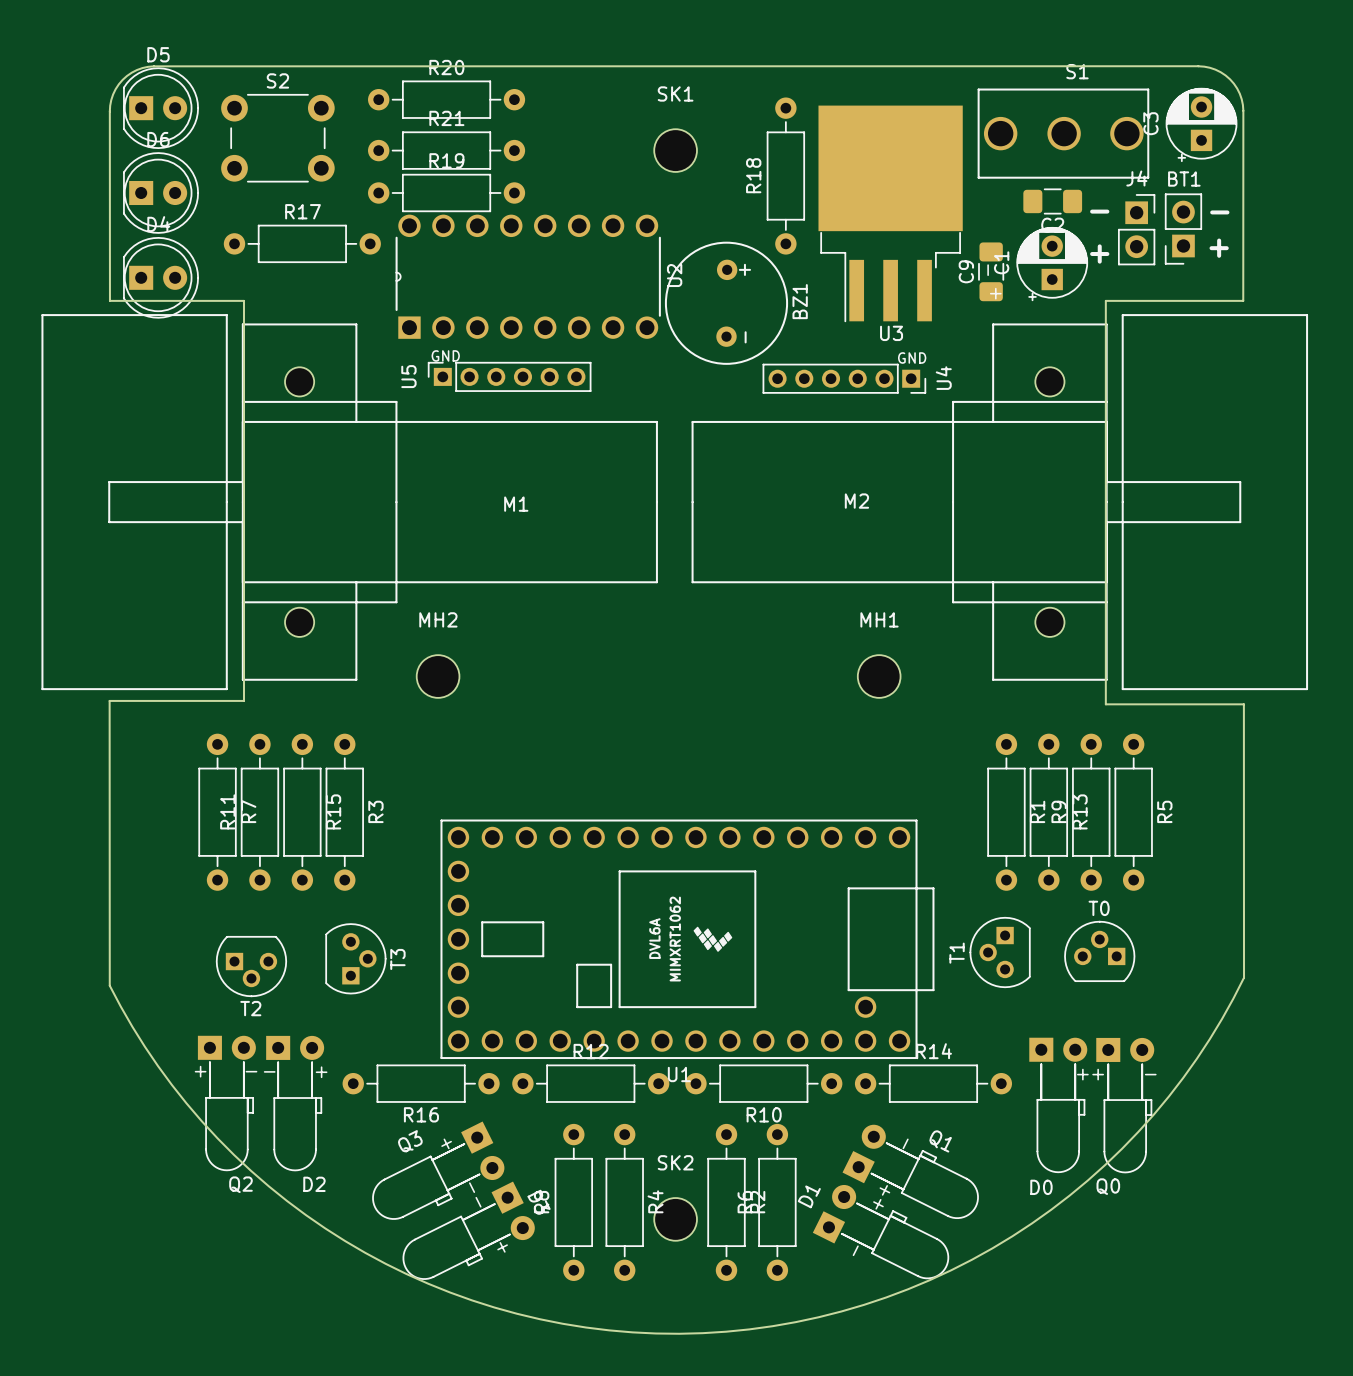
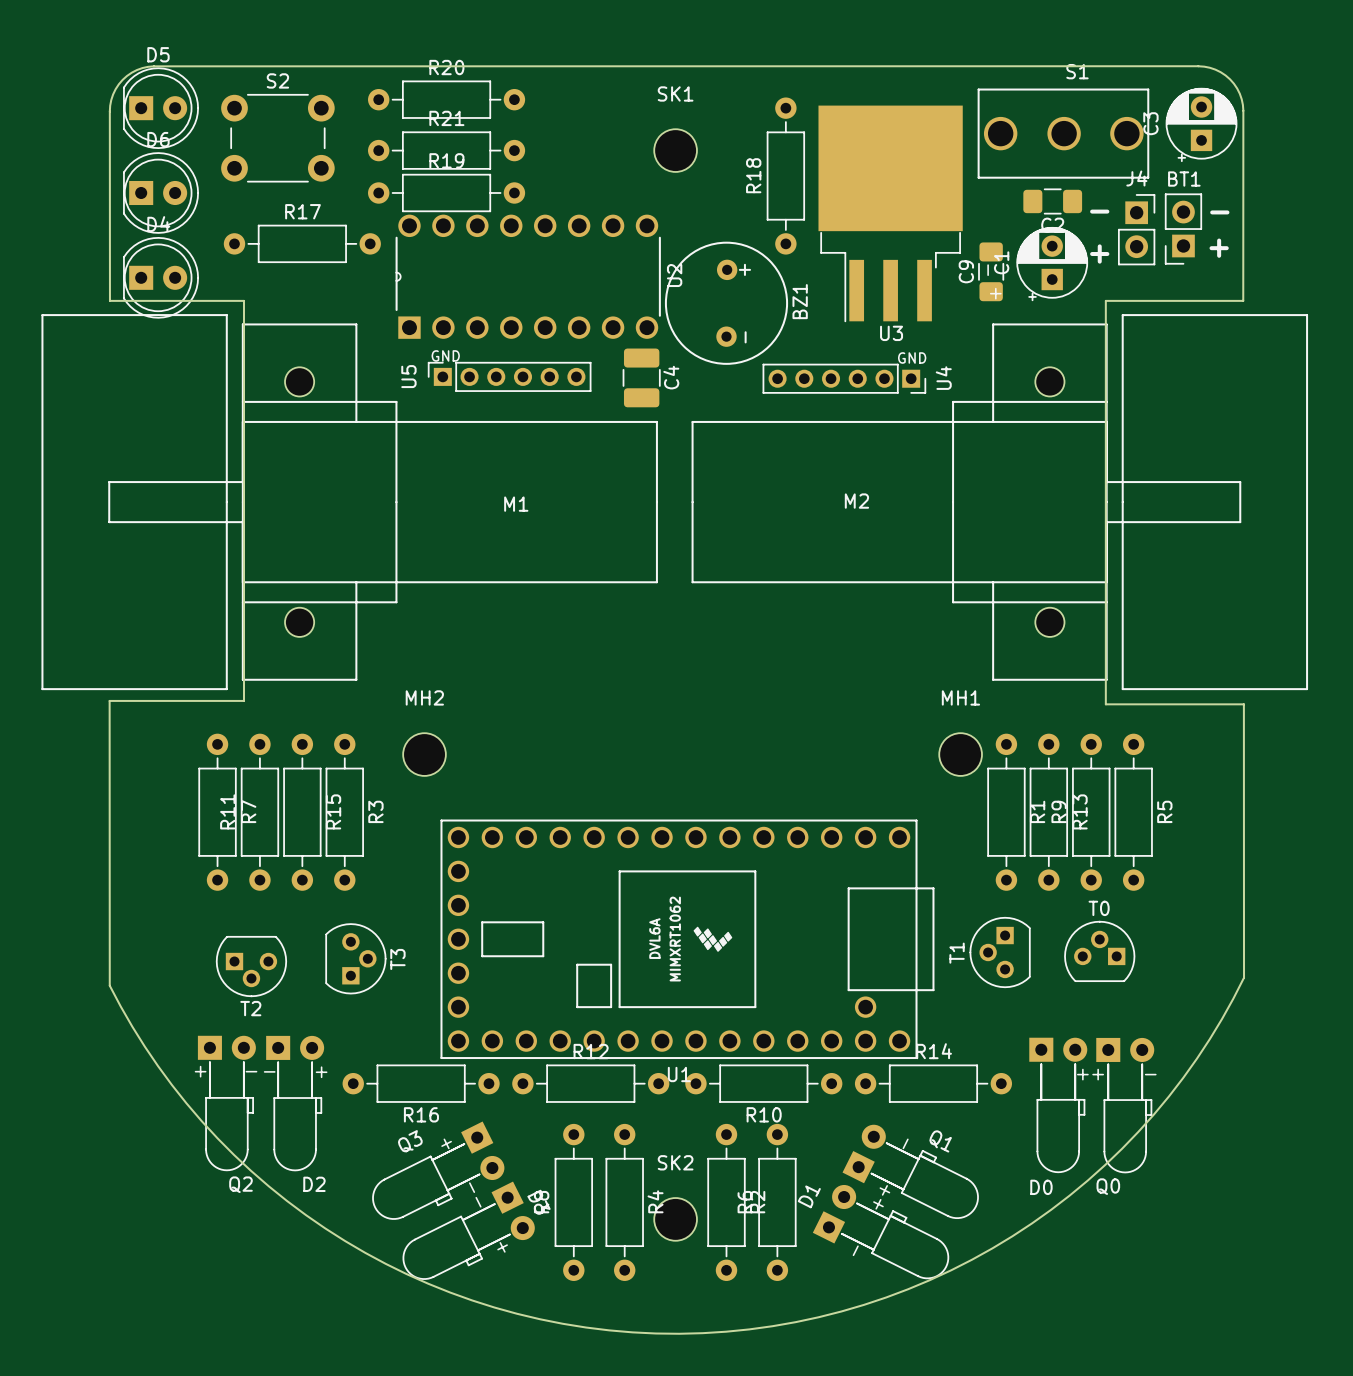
C4: none -> (641, 377)
MH2 position: (438, 676) -> (424, 754)
MH1 position: (879, 676) -> (960, 754)

